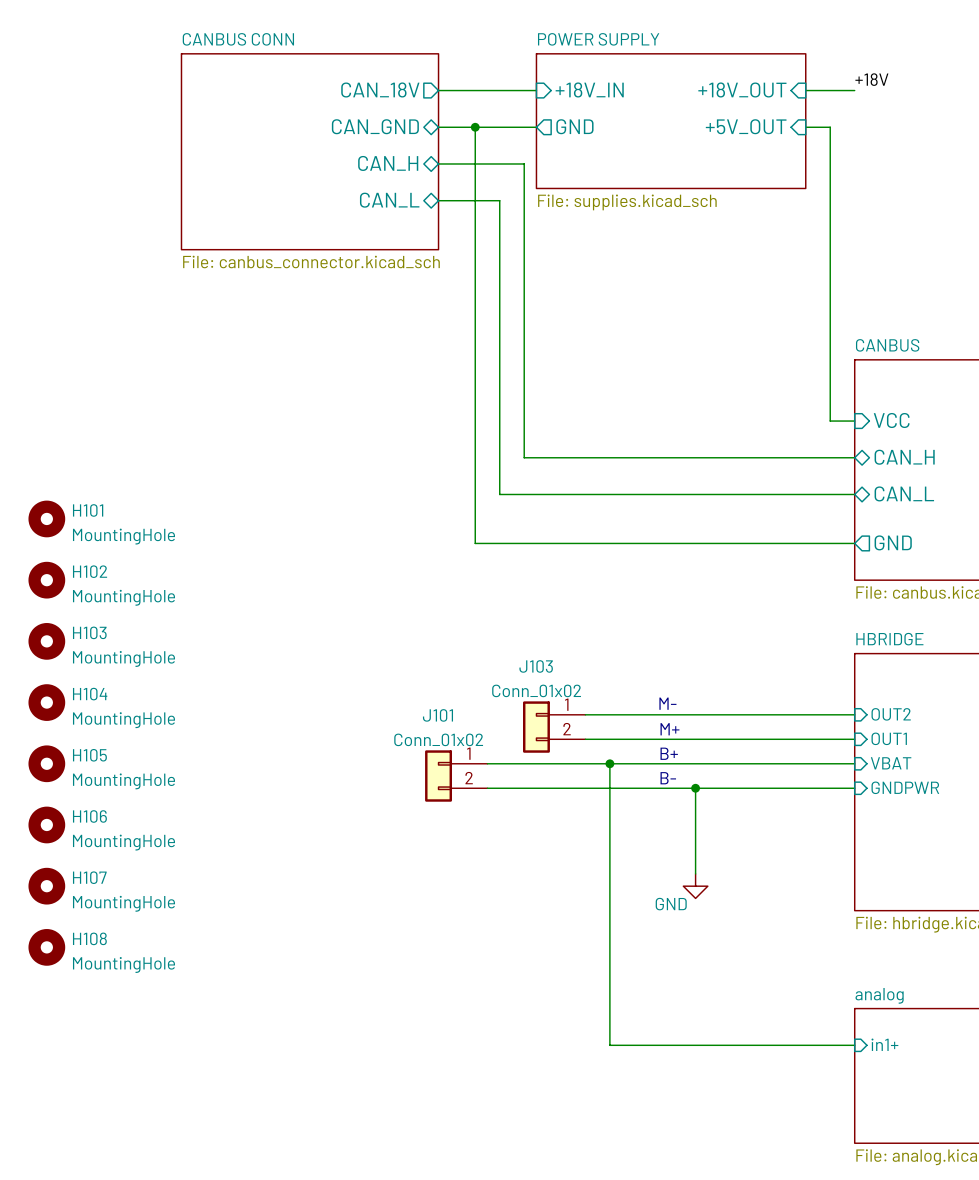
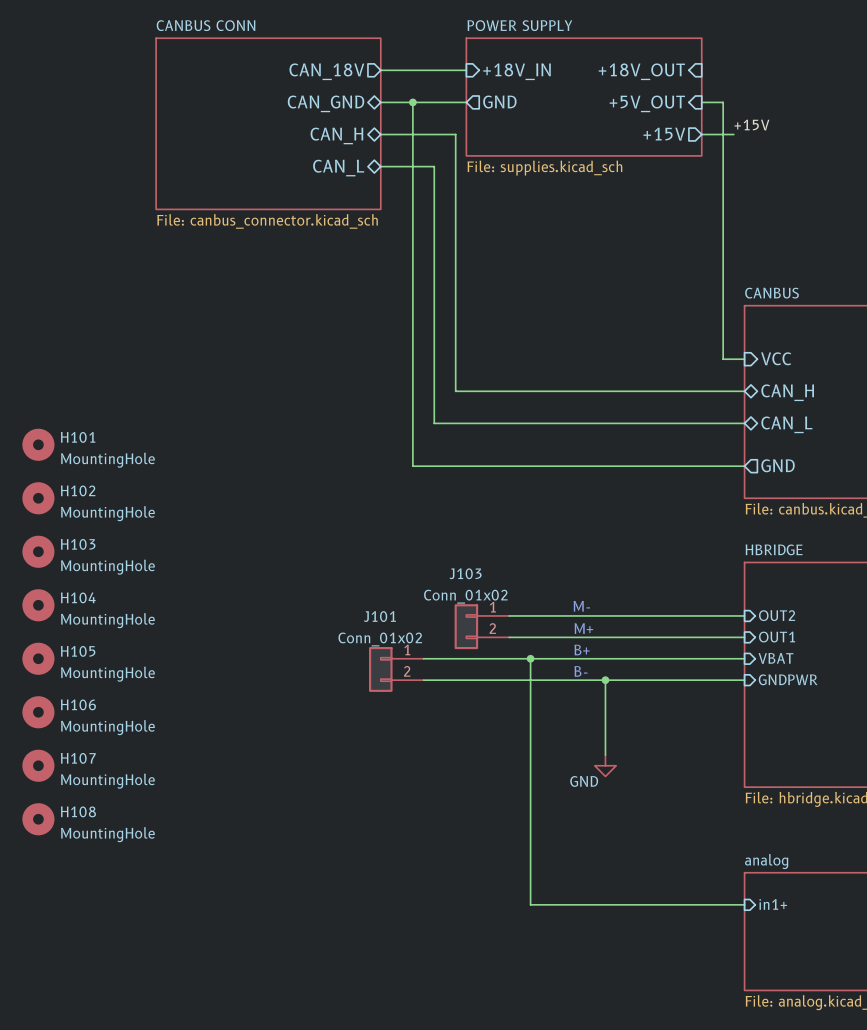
label: +18V (871, 79) -> none
wire: (805, 90) (854, 90) -> none
label: none -> +15V (751, 125)
sheet pin: none -> +15V (664, 134)
wire: none -> (701, 134) (733, 134)

